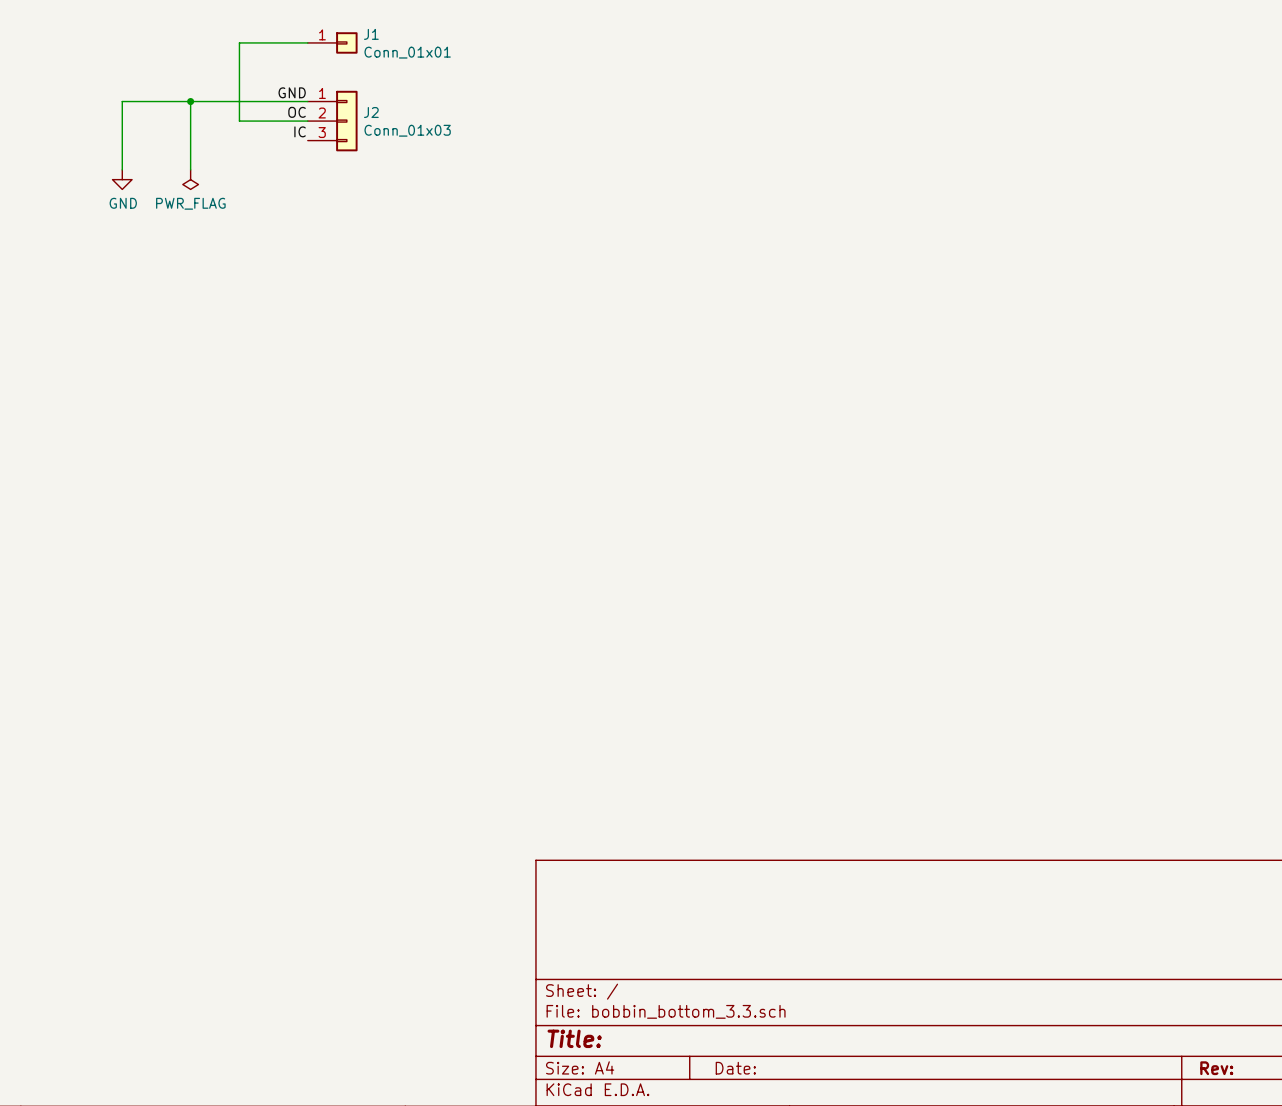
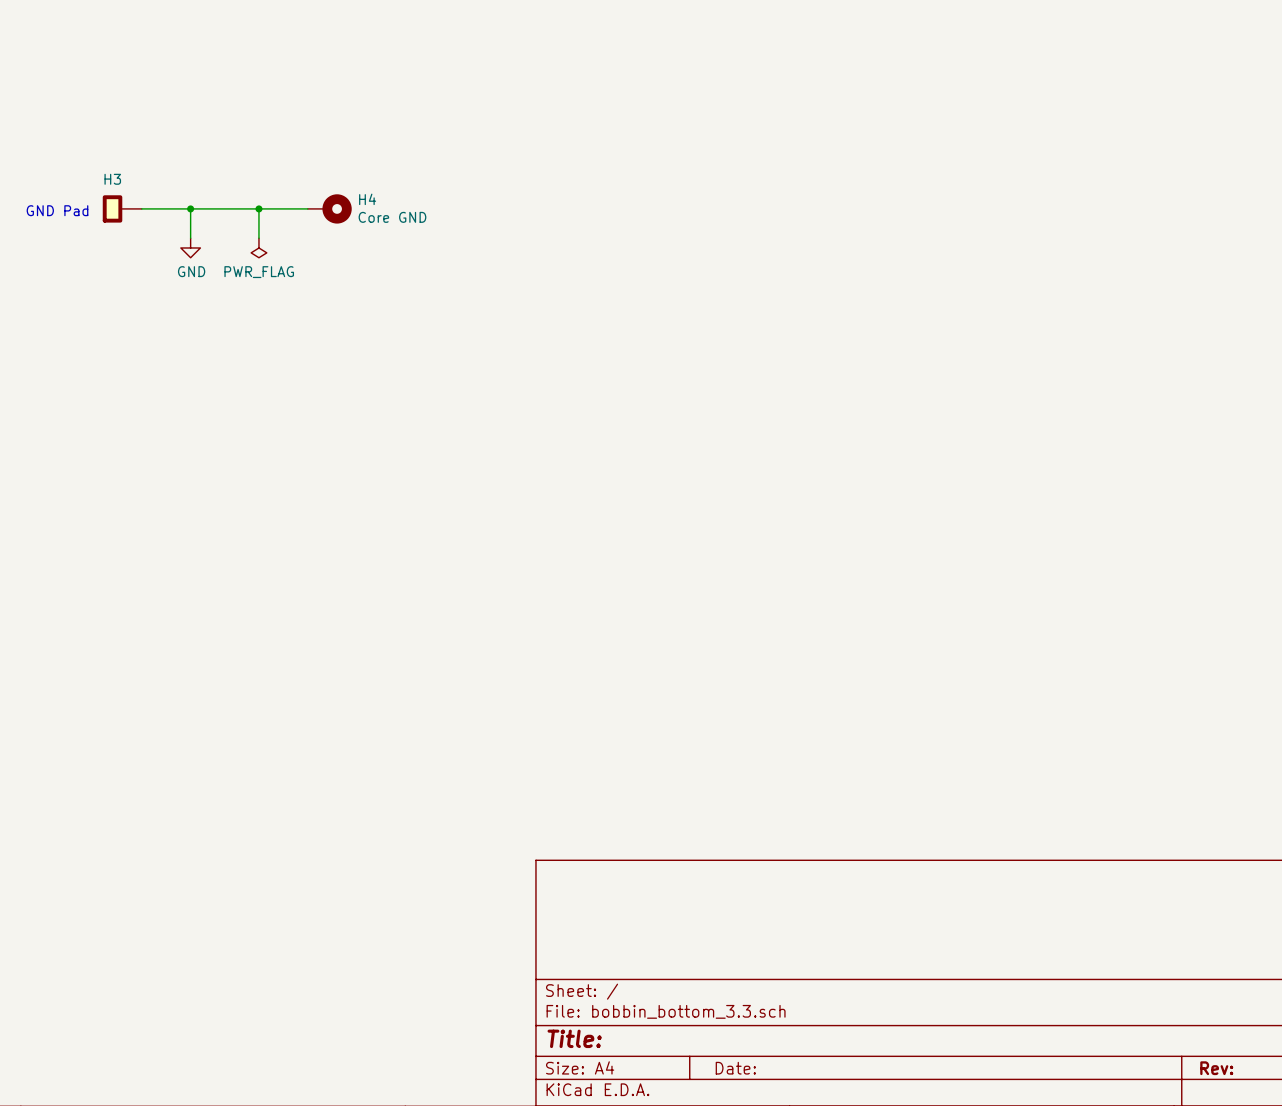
wire: (307, 42) (239, 42) (239, 121) (307, 121) -> none
J1: Conn_01x01 (332, 42) -> none
label: GND (292, 92) -> none
wire: (190, 101) (190, 169) -> none
junction: (190, 101) -> none
wire: (307, 101) (122, 101) (122, 169) -> none
label: OC (297, 112) -> none
J2: Conn_01x03 (332, 121) -> none
label: IC (300, 131) -> none
power symbol position: GND (122, 179) -> GND (190, 247)
power symbol position: PWR_FLAG (190, 179) -> PWR_FLAG (258, 247)
H3: none -> (122, 208)
wire: none -> (141, 208) (307, 208)
wire: none -> (190, 208) (190, 238)
junction: none -> (190, 208)
wire: none -> (258, 208) (258, 238)
junction: none -> (258, 208)
H4: none -> Core GND (329, 208)
text: none -> GND Pad (57, 210)

